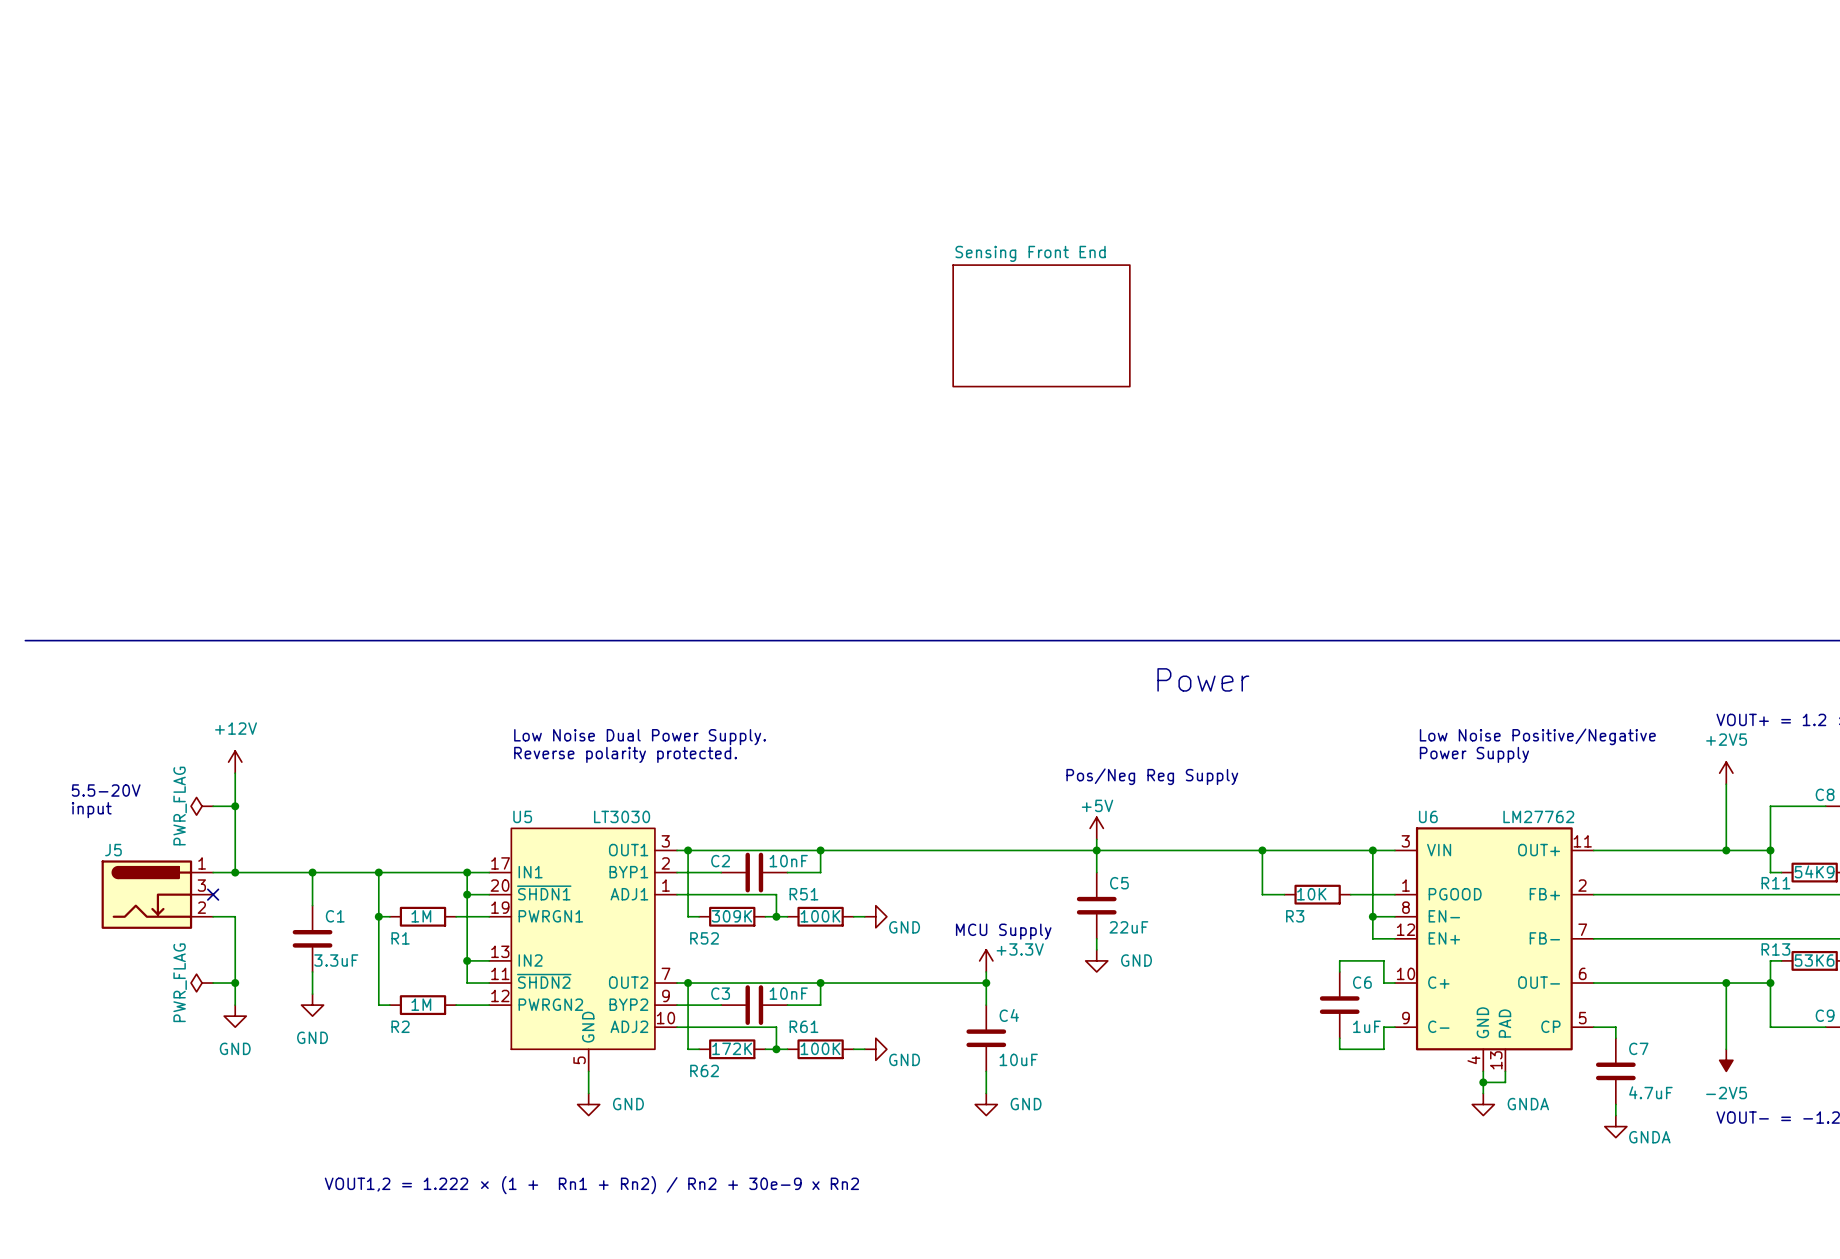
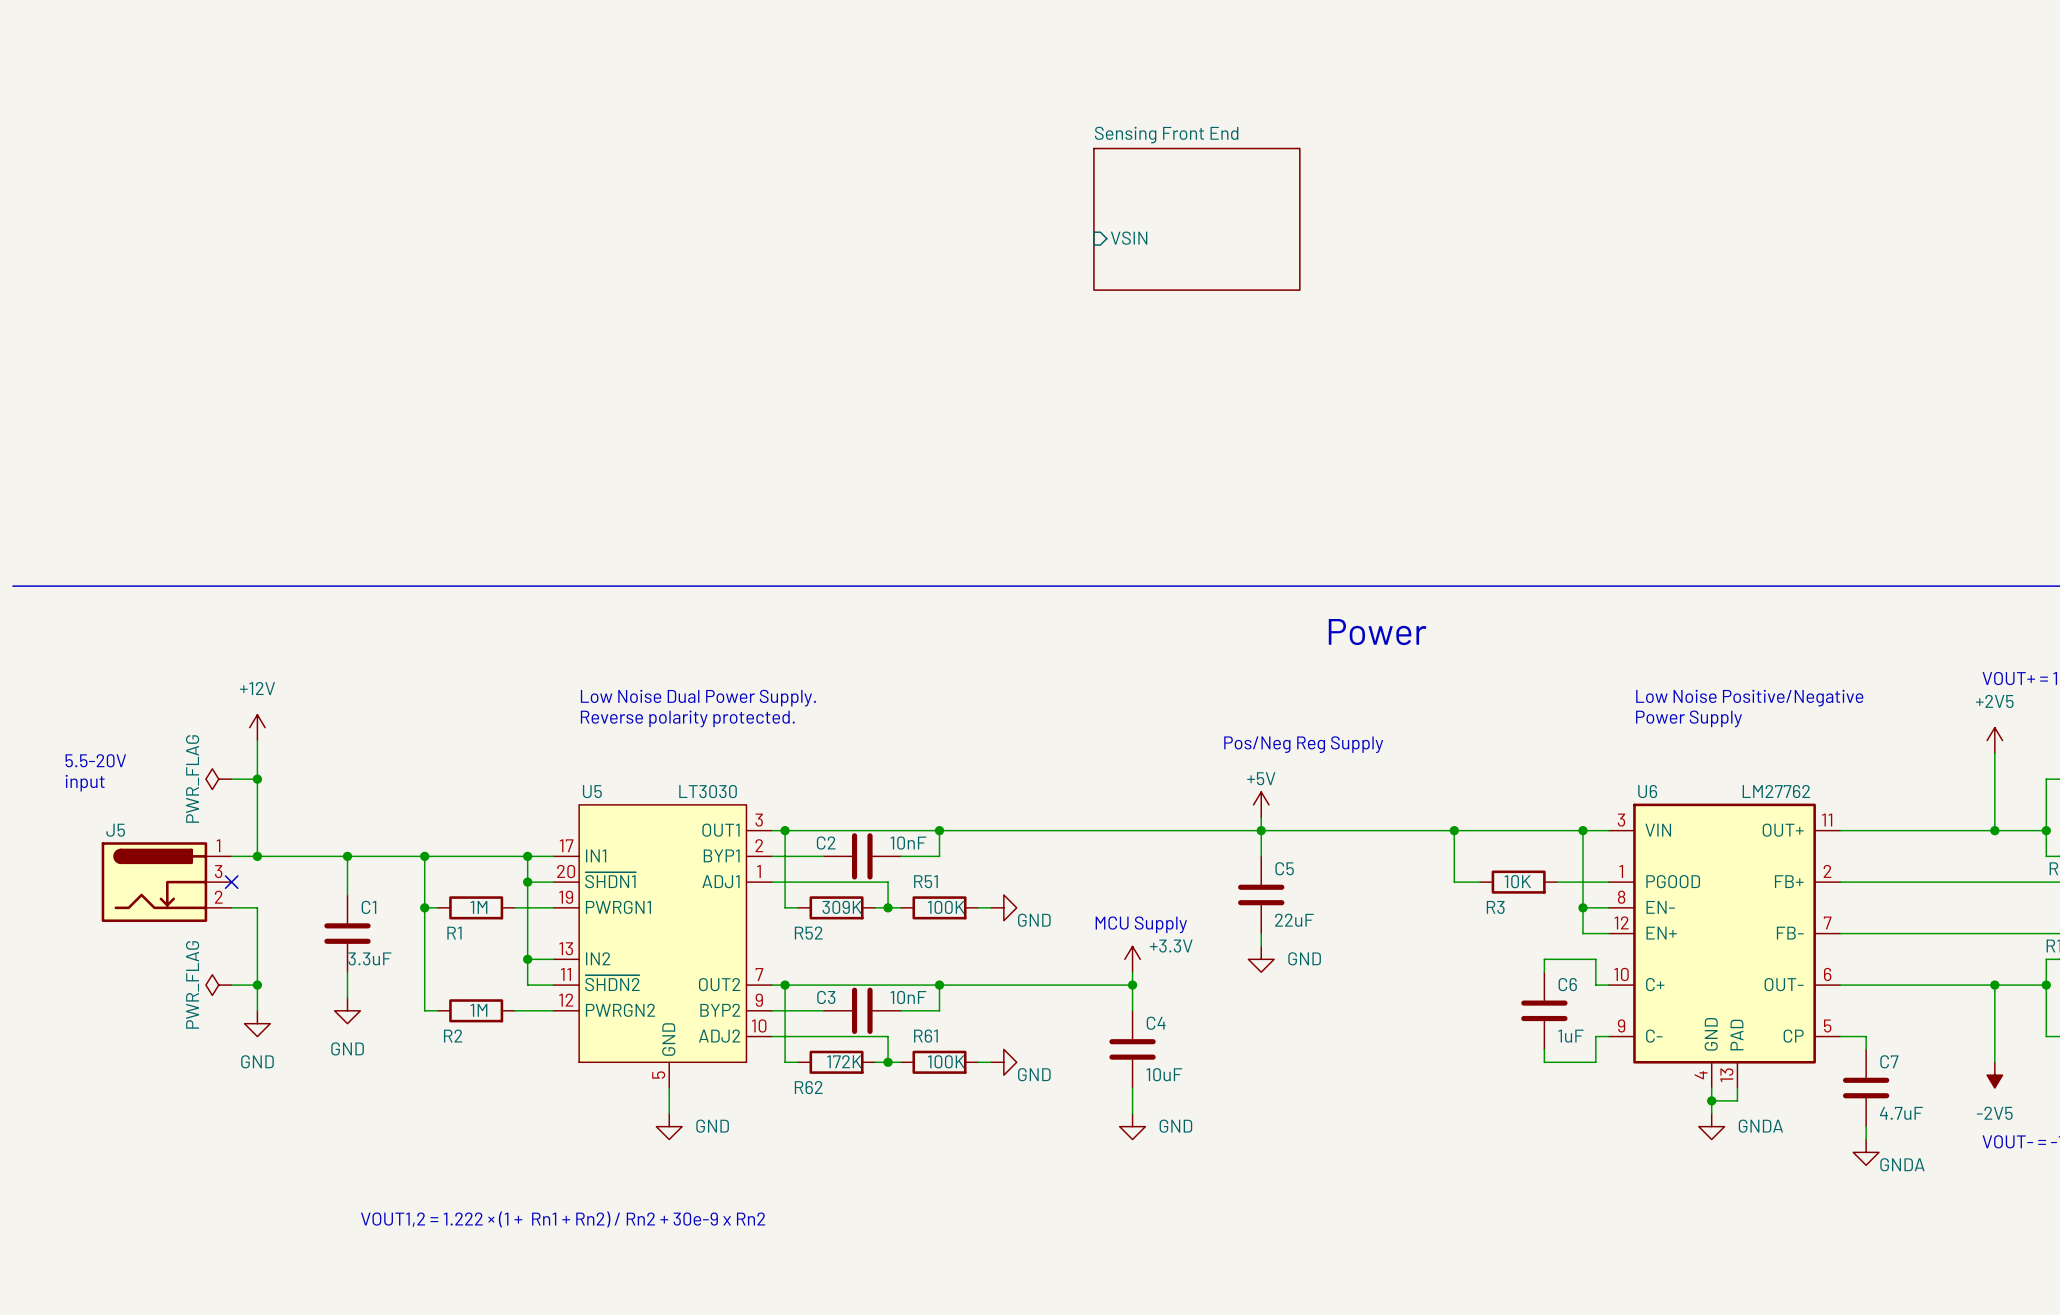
sheet pin: none -> VSIN (1129, 238)

